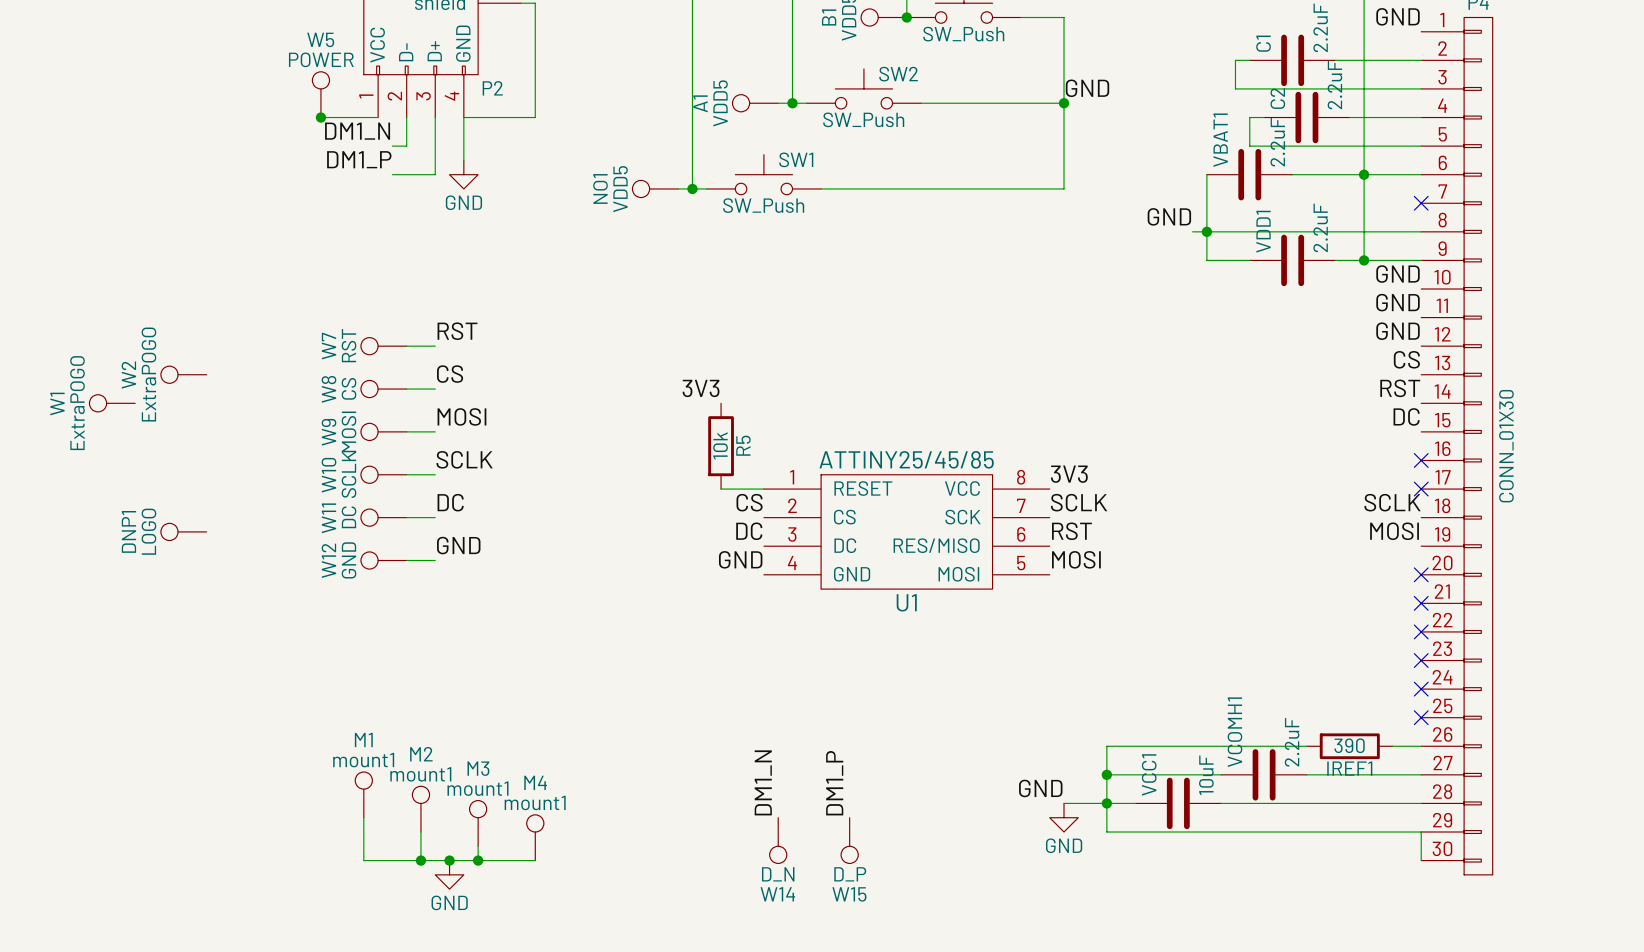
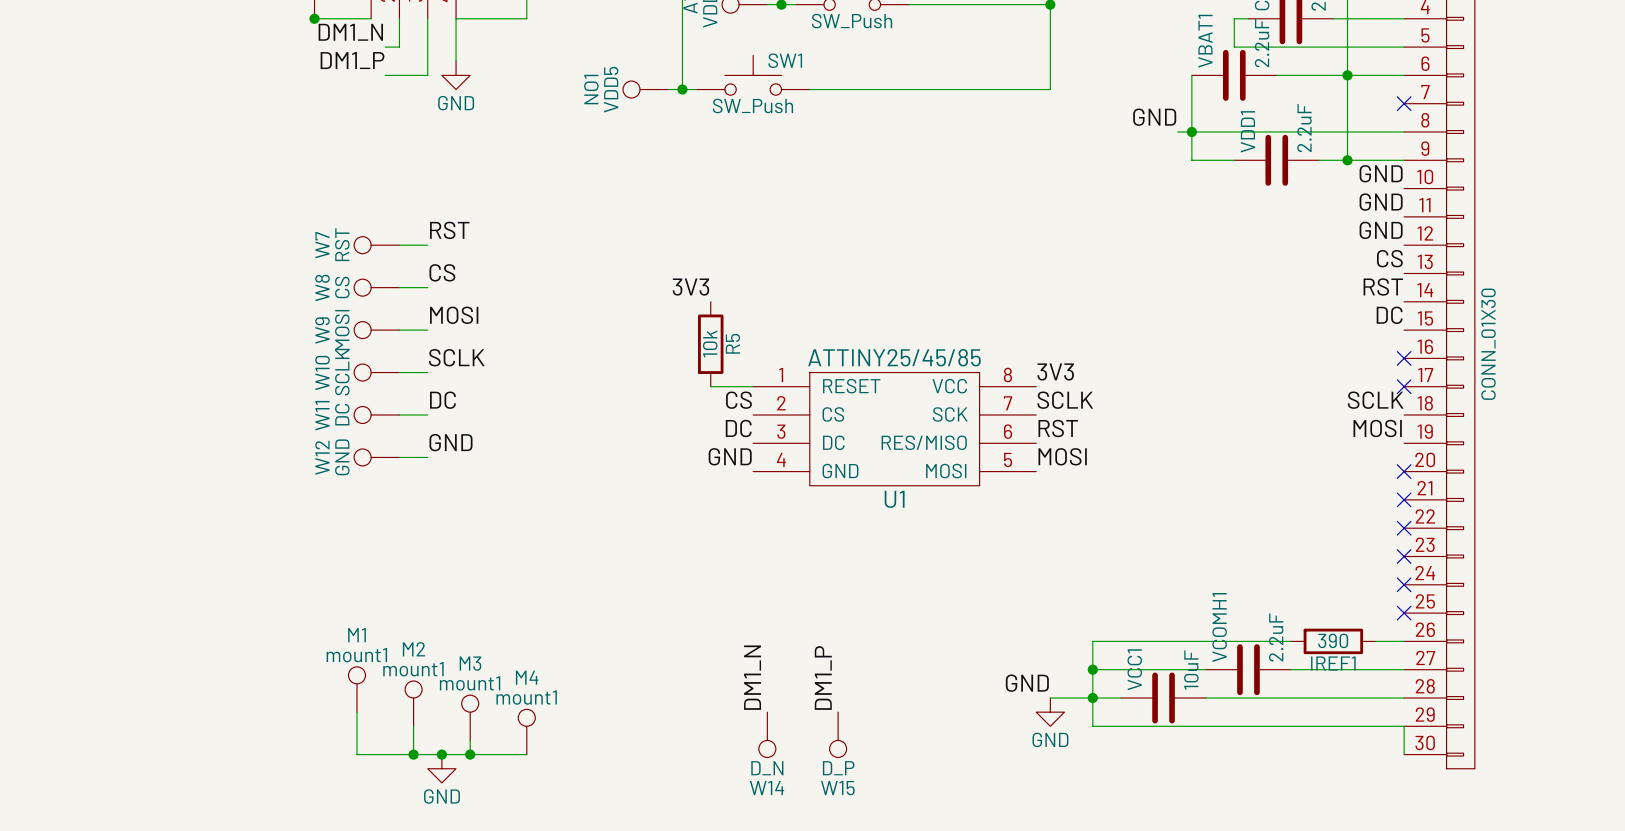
W2: ExtraPOGO (183, 374) -> none
W1: ExtraPOGO (112, 403) -> none
DNP1: LOGO (183, 531) -> none

